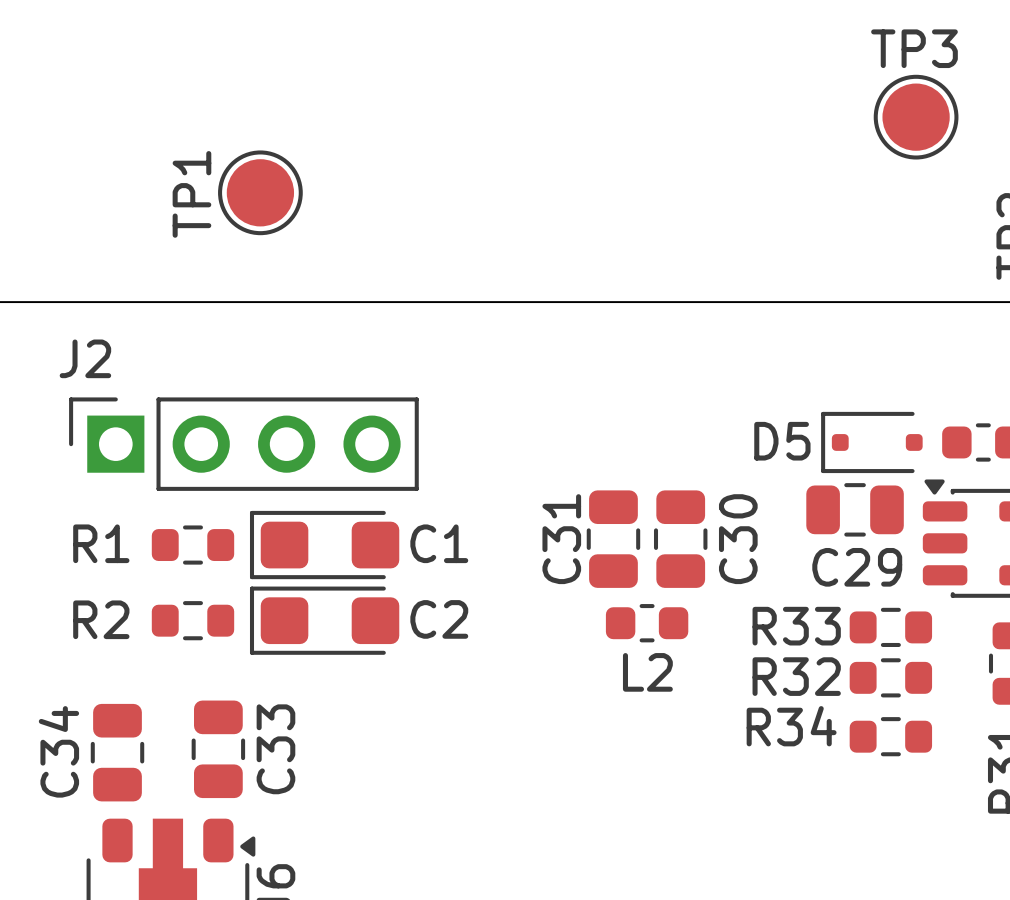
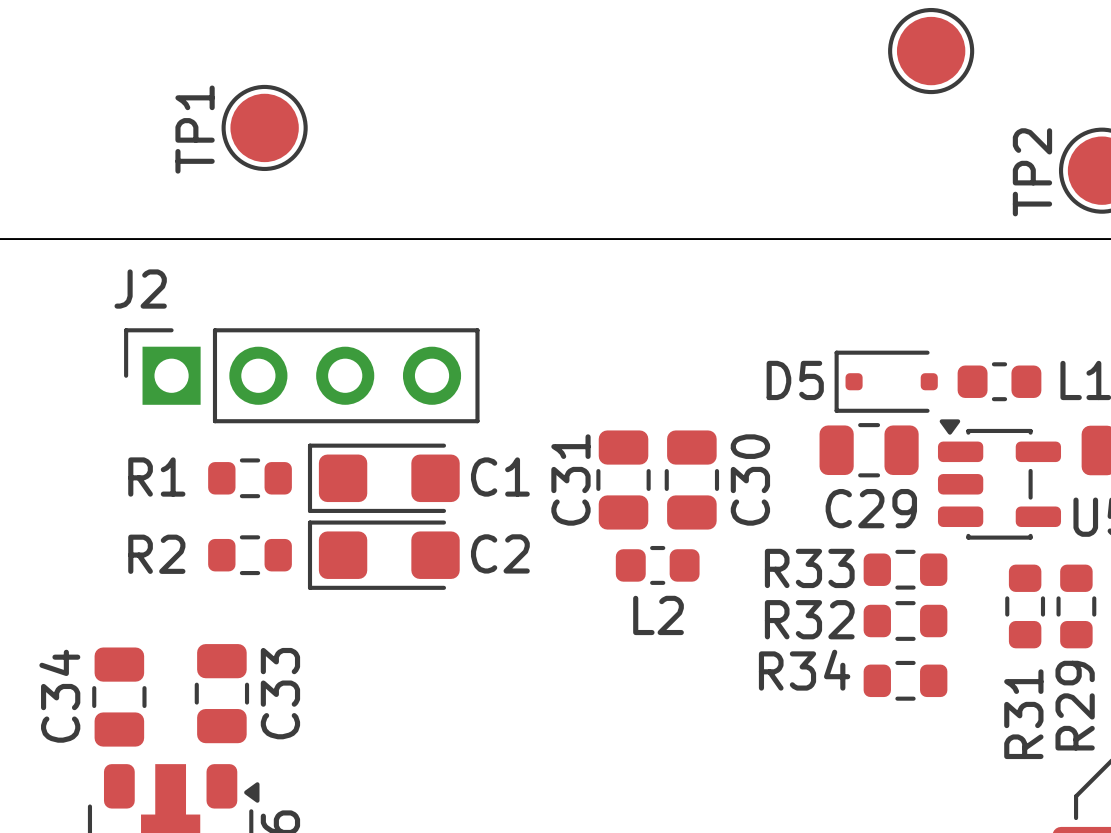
J2 position: (243, 444) -> (301, 375)
R1 position: (192, 545) -> (250, 478)
C1 position: (324, 545) -> (383, 478)
R2 position: (192, 620) -> (250, 555)
C2 position: (324, 620) -> (383, 555)

